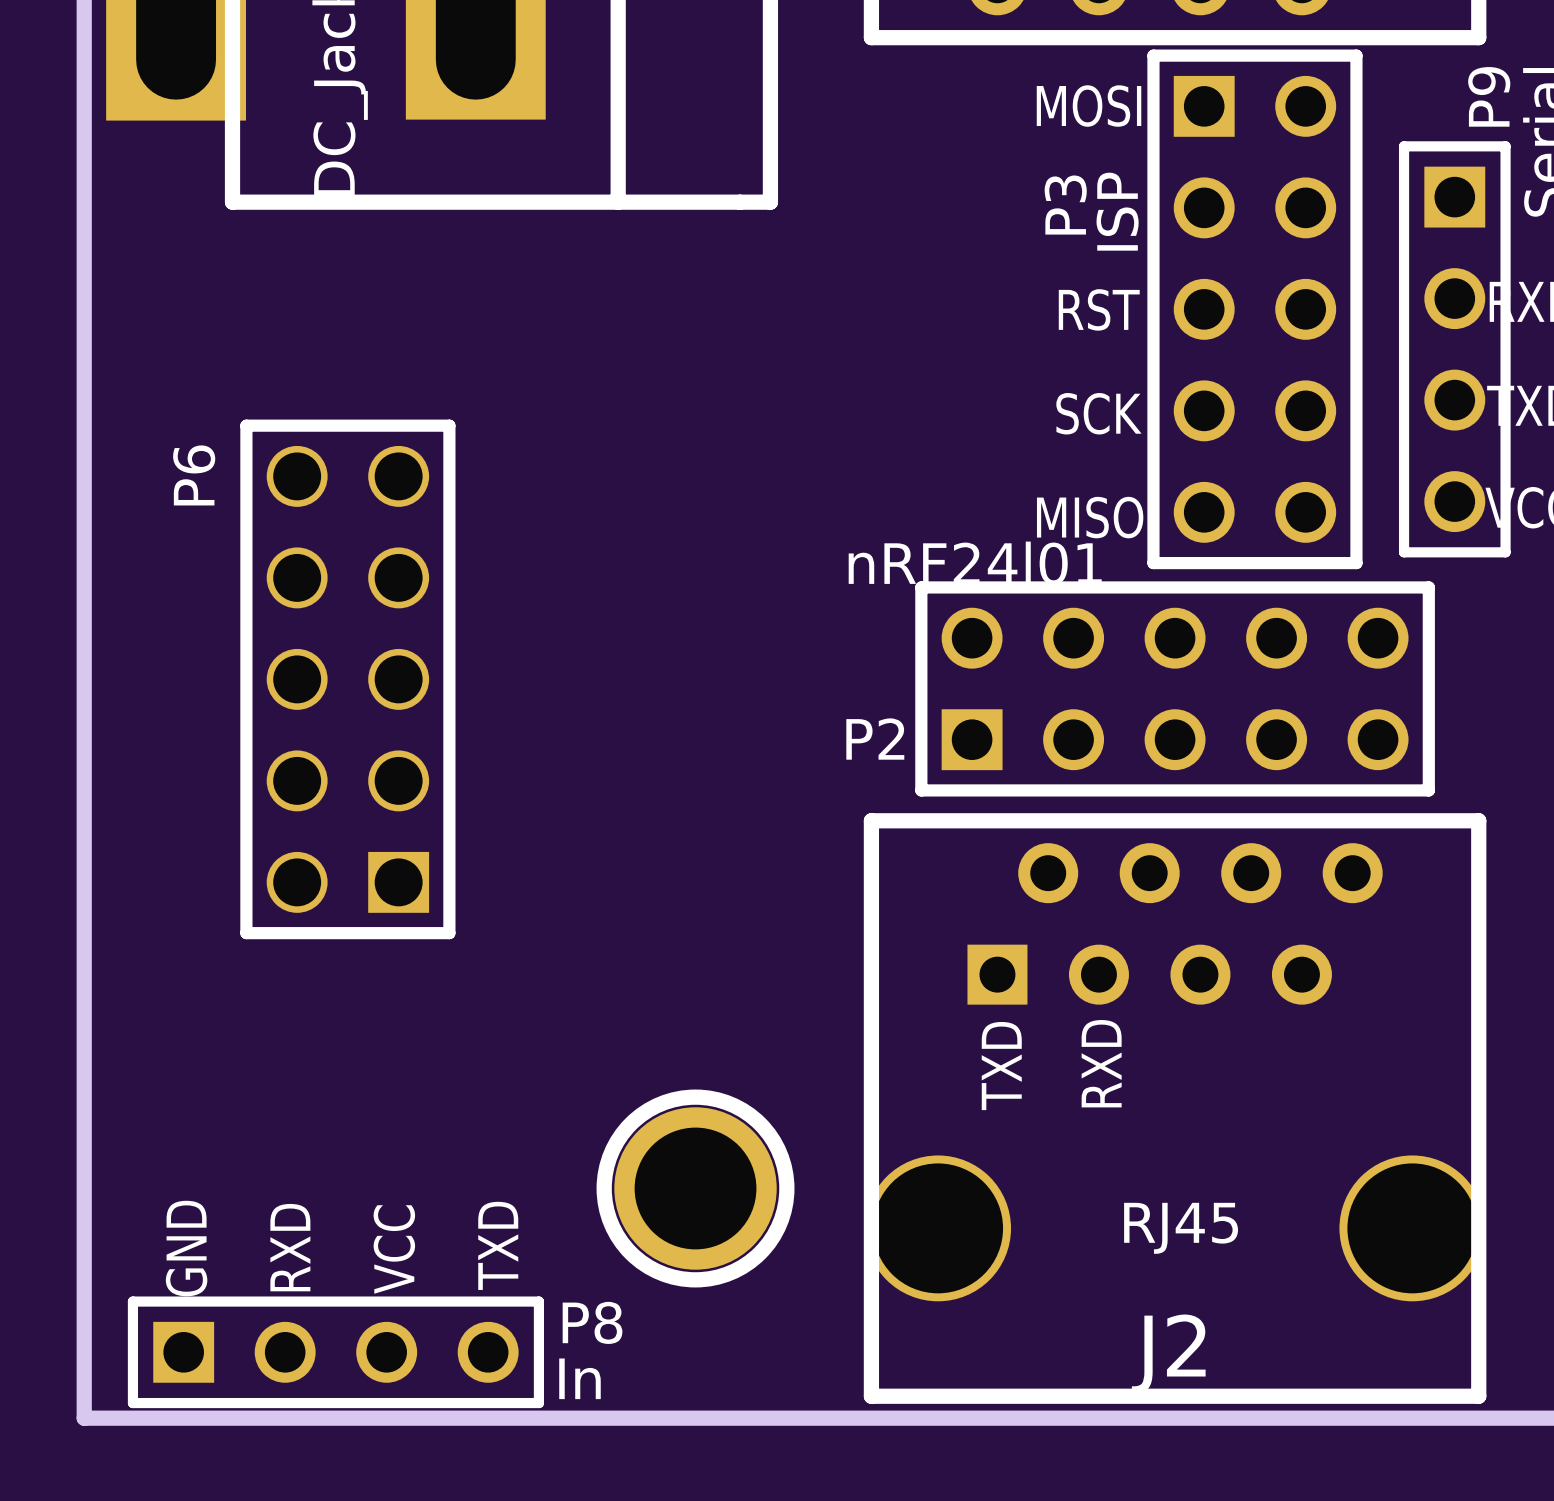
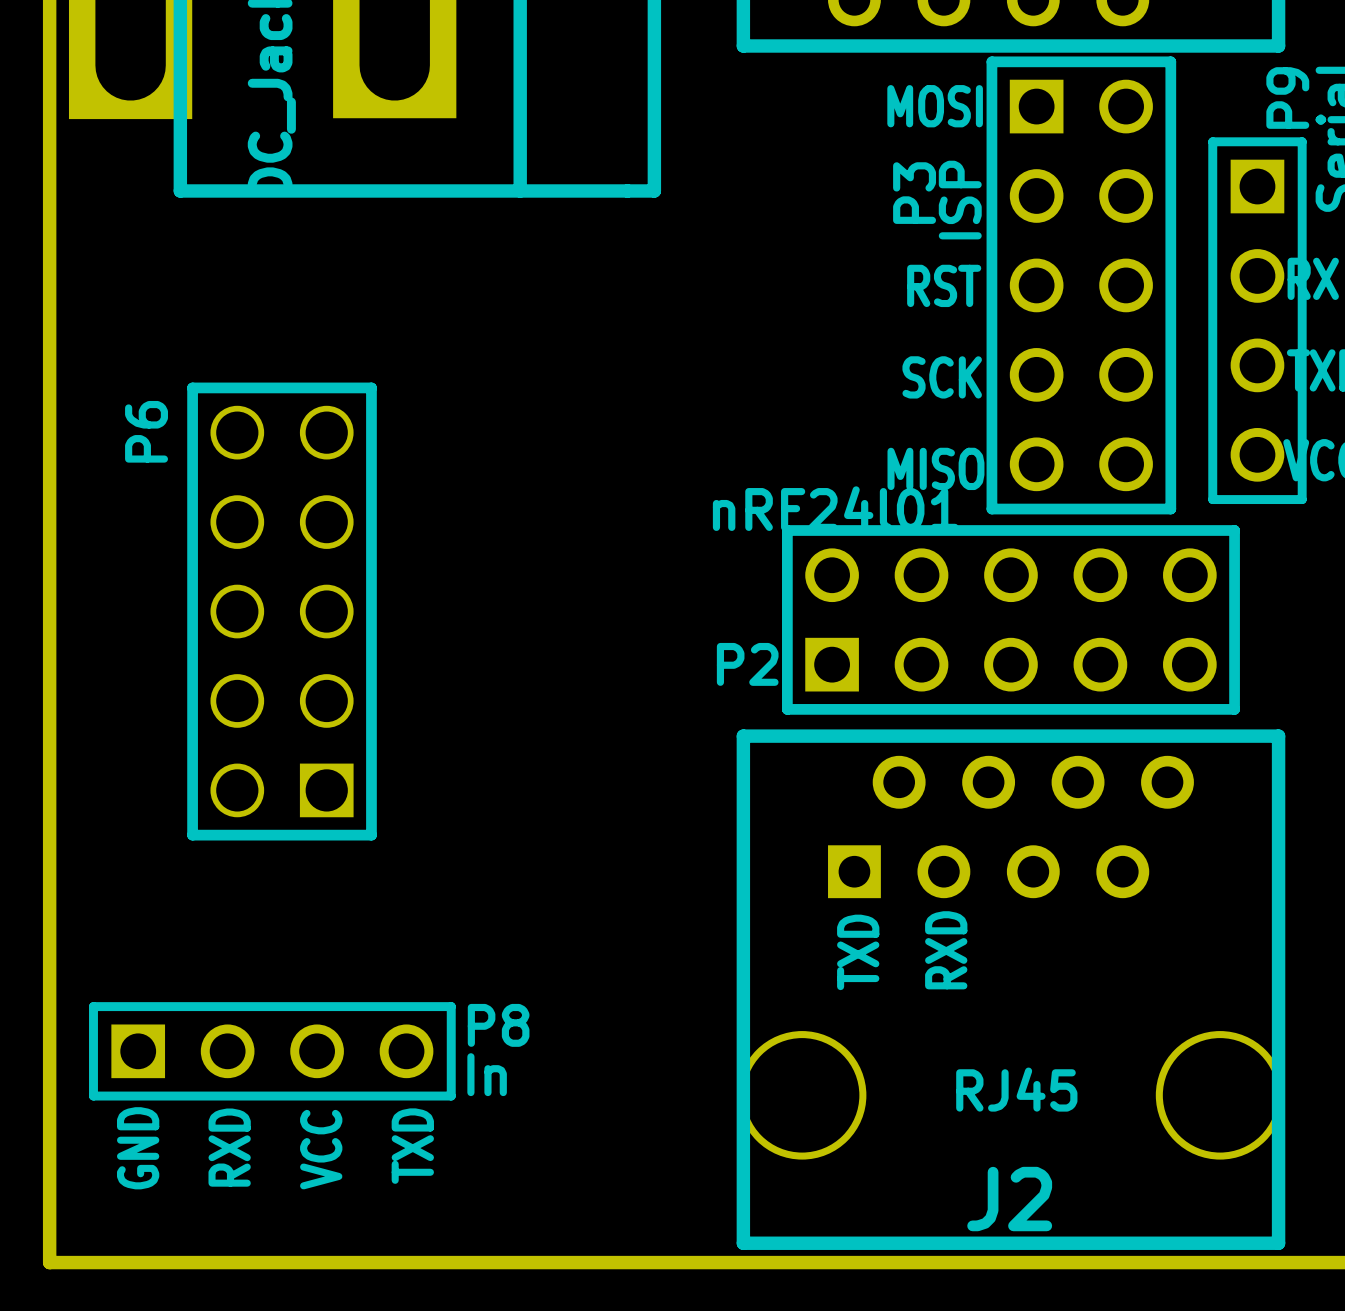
part: (695, 1188) -> none
text position: TXD (498, 1245) -> TXD (412, 1146)
text position: RXD (290, 1247) -> RXD (229, 1147)
text position: GND (186, 1248) -> GND (138, 1148)
text position: VCC (394, 1249) -> VCC (321, 1149)
P8 position: (335, 1352) -> (272, 1051)

